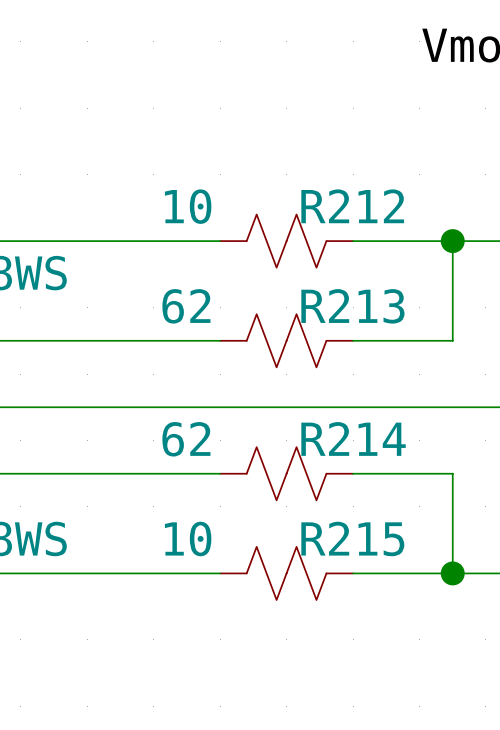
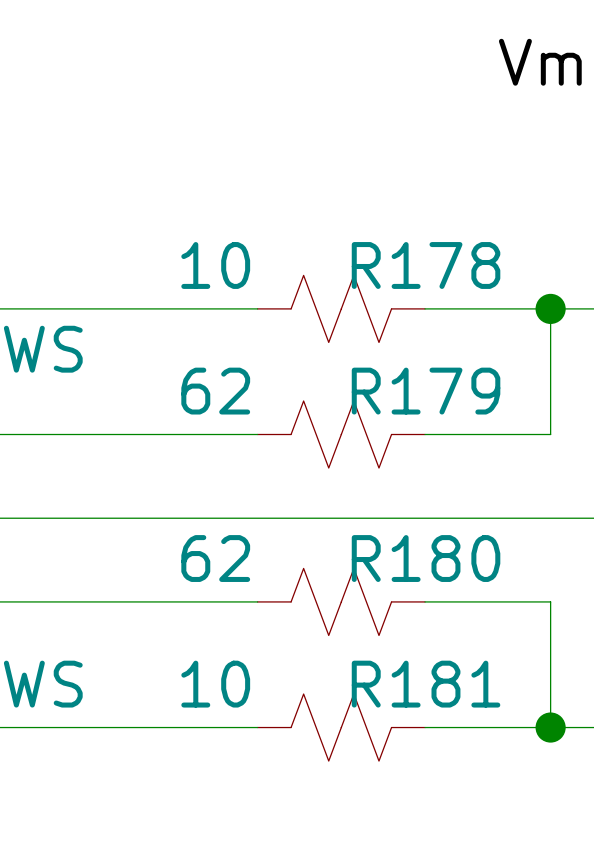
R212 name: R212 (352, 206) -> R178 (426, 265)
R213 name: R213 (352, 306) -> R179 (426, 391)
R214 name: R214 (353, 438) -> R180 (426, 558)
R215 name: R215 (352, 538) -> R181 (426, 684)

